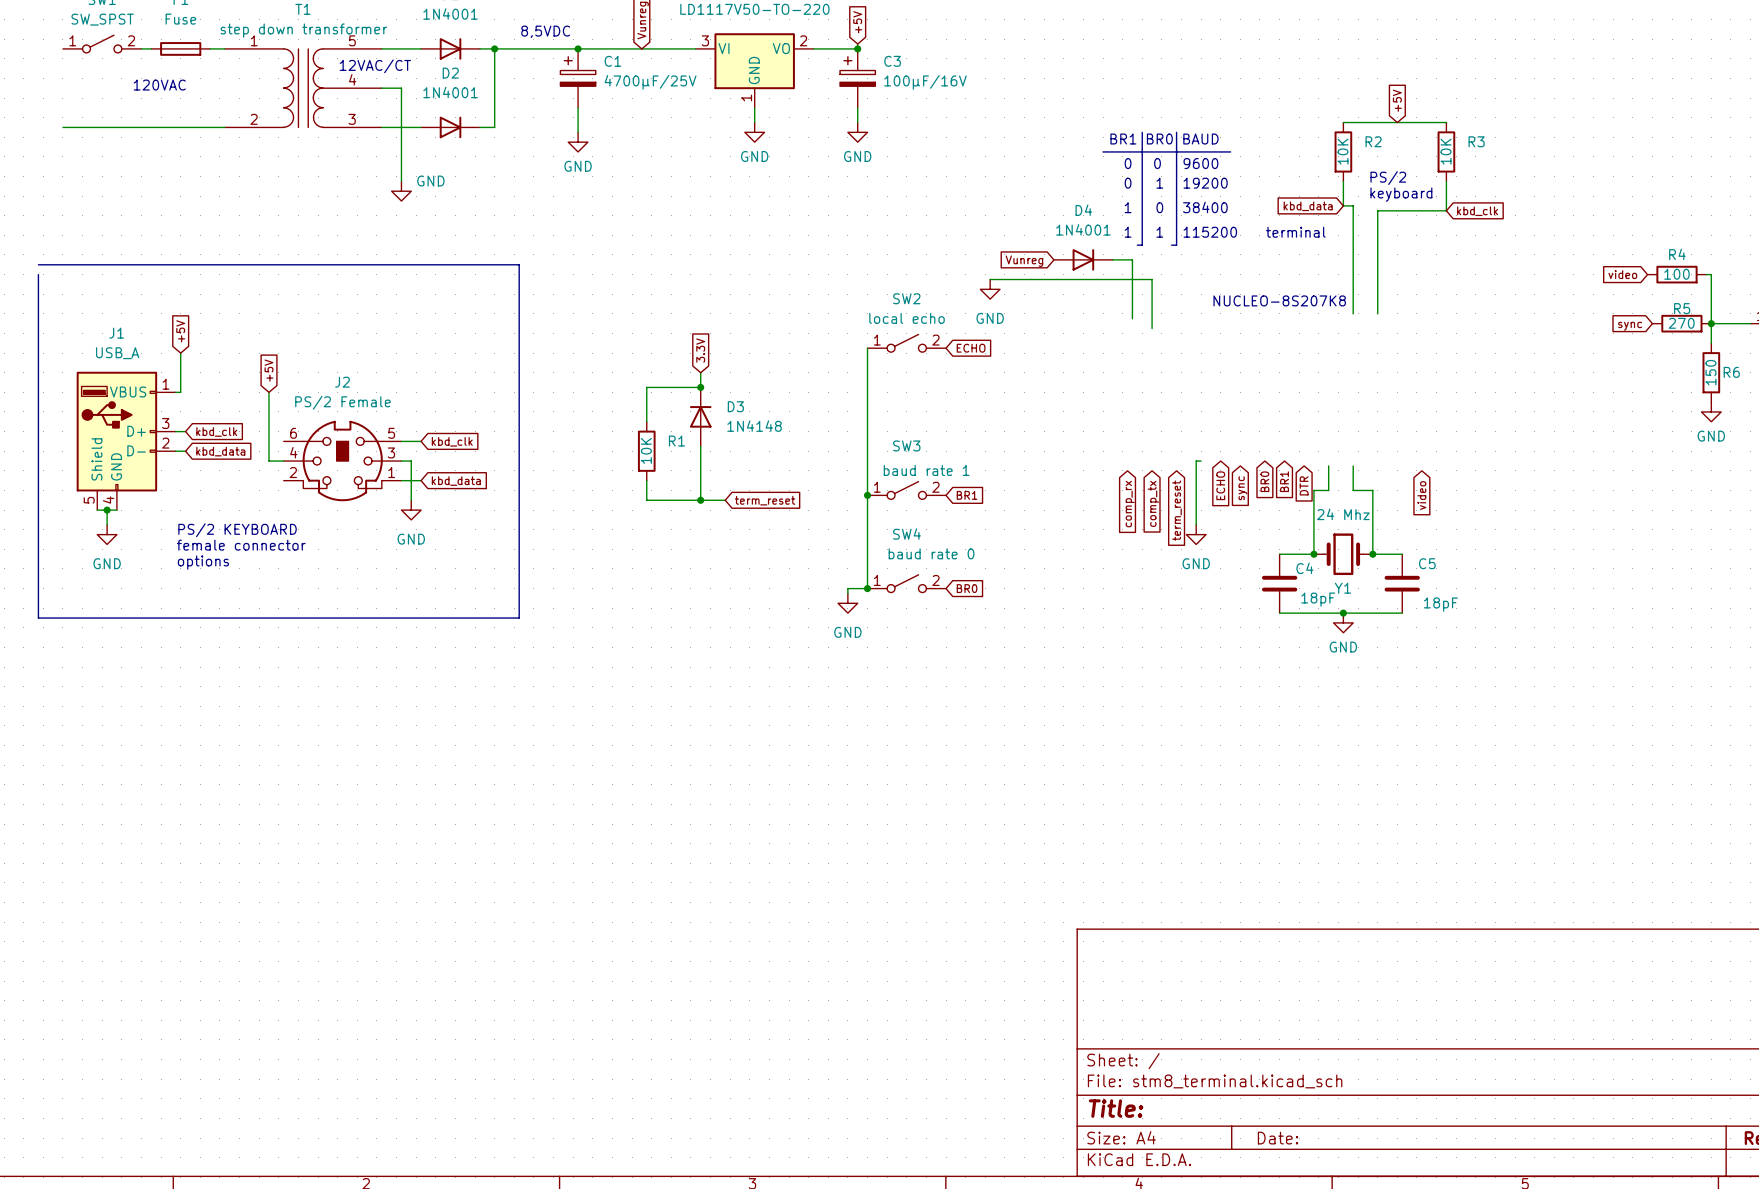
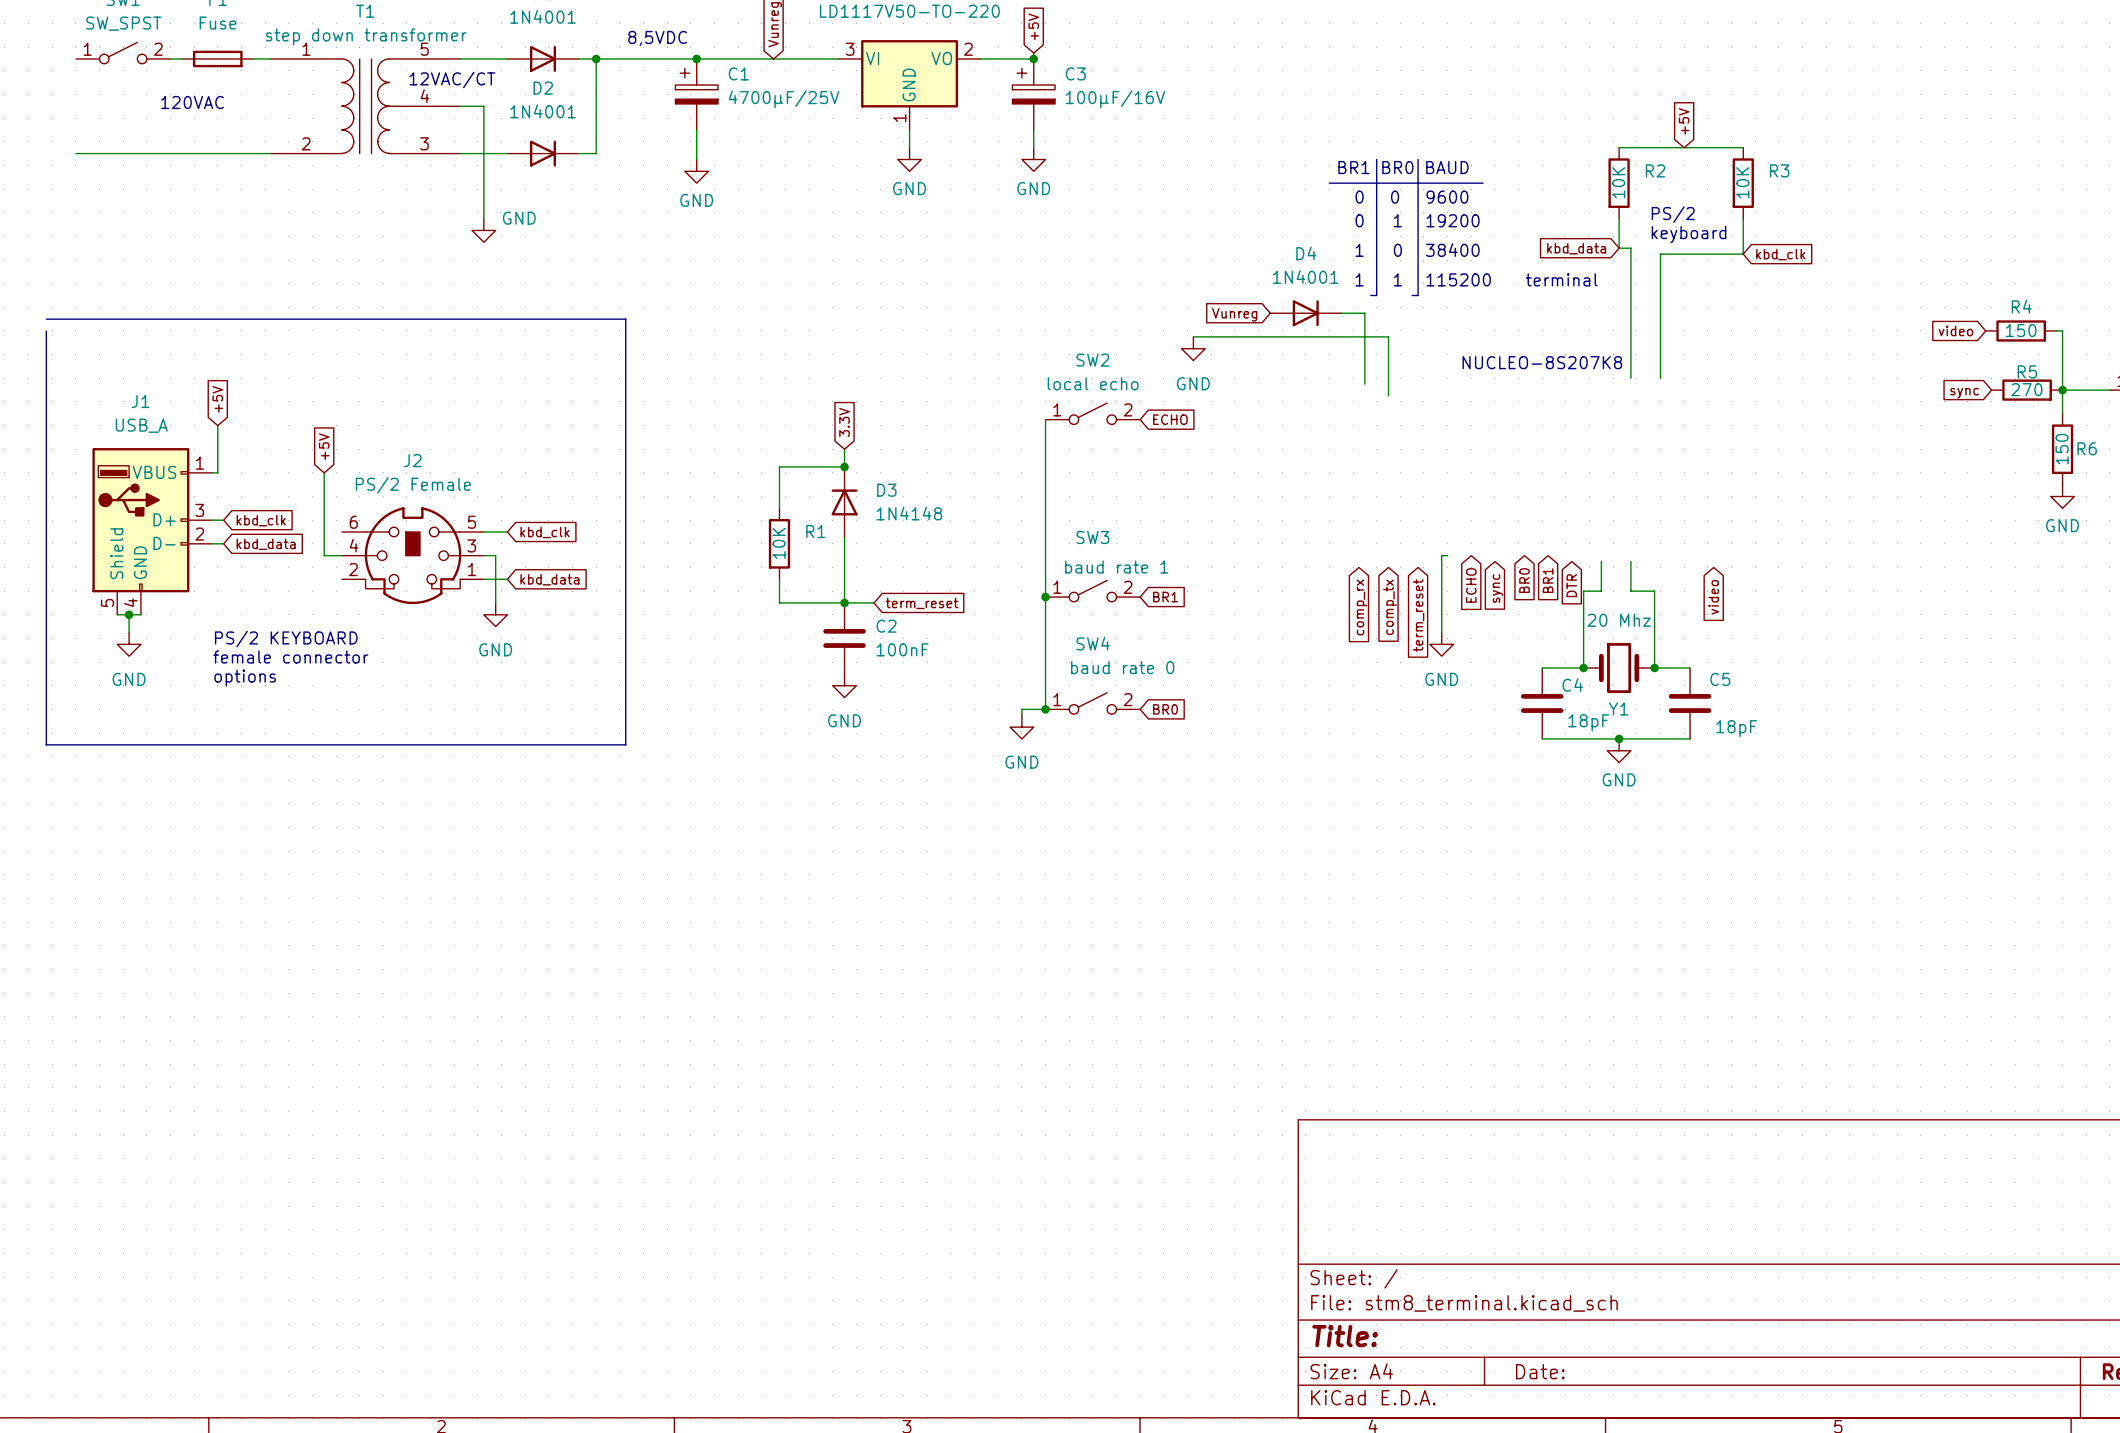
R4 value: 100 (1676, 274) -> 150 (2021, 330)
Y1 value: 24 Mhz (1343, 514) -> 20 Mhz (1619, 620)
C2: none -> 100nF (844, 638)
power symbol: none -> GND (844, 685)

